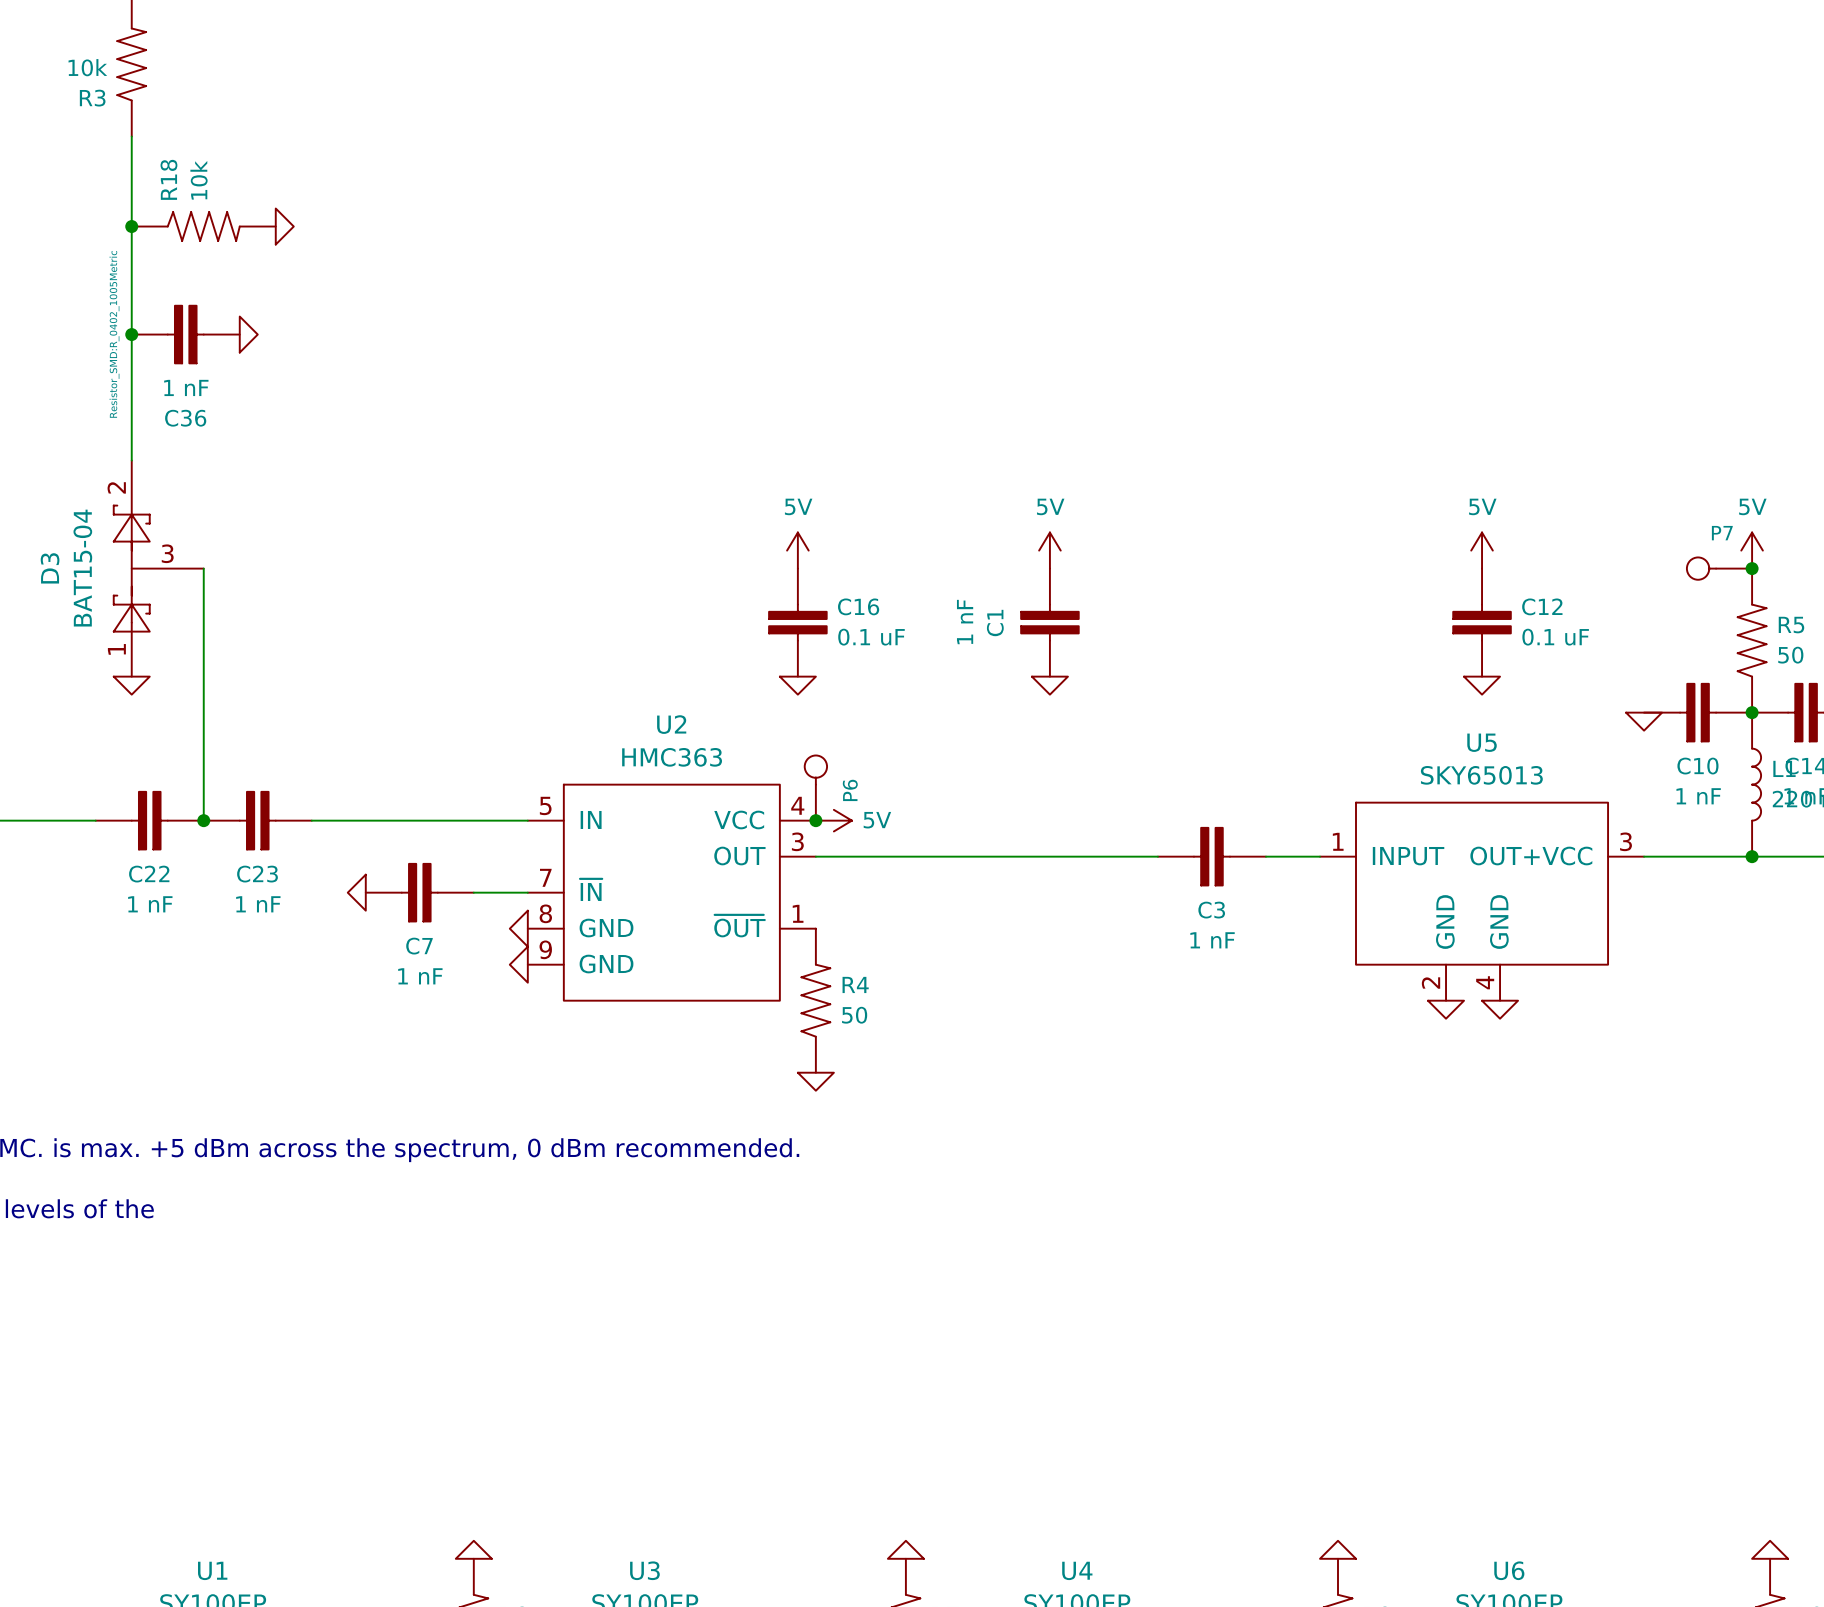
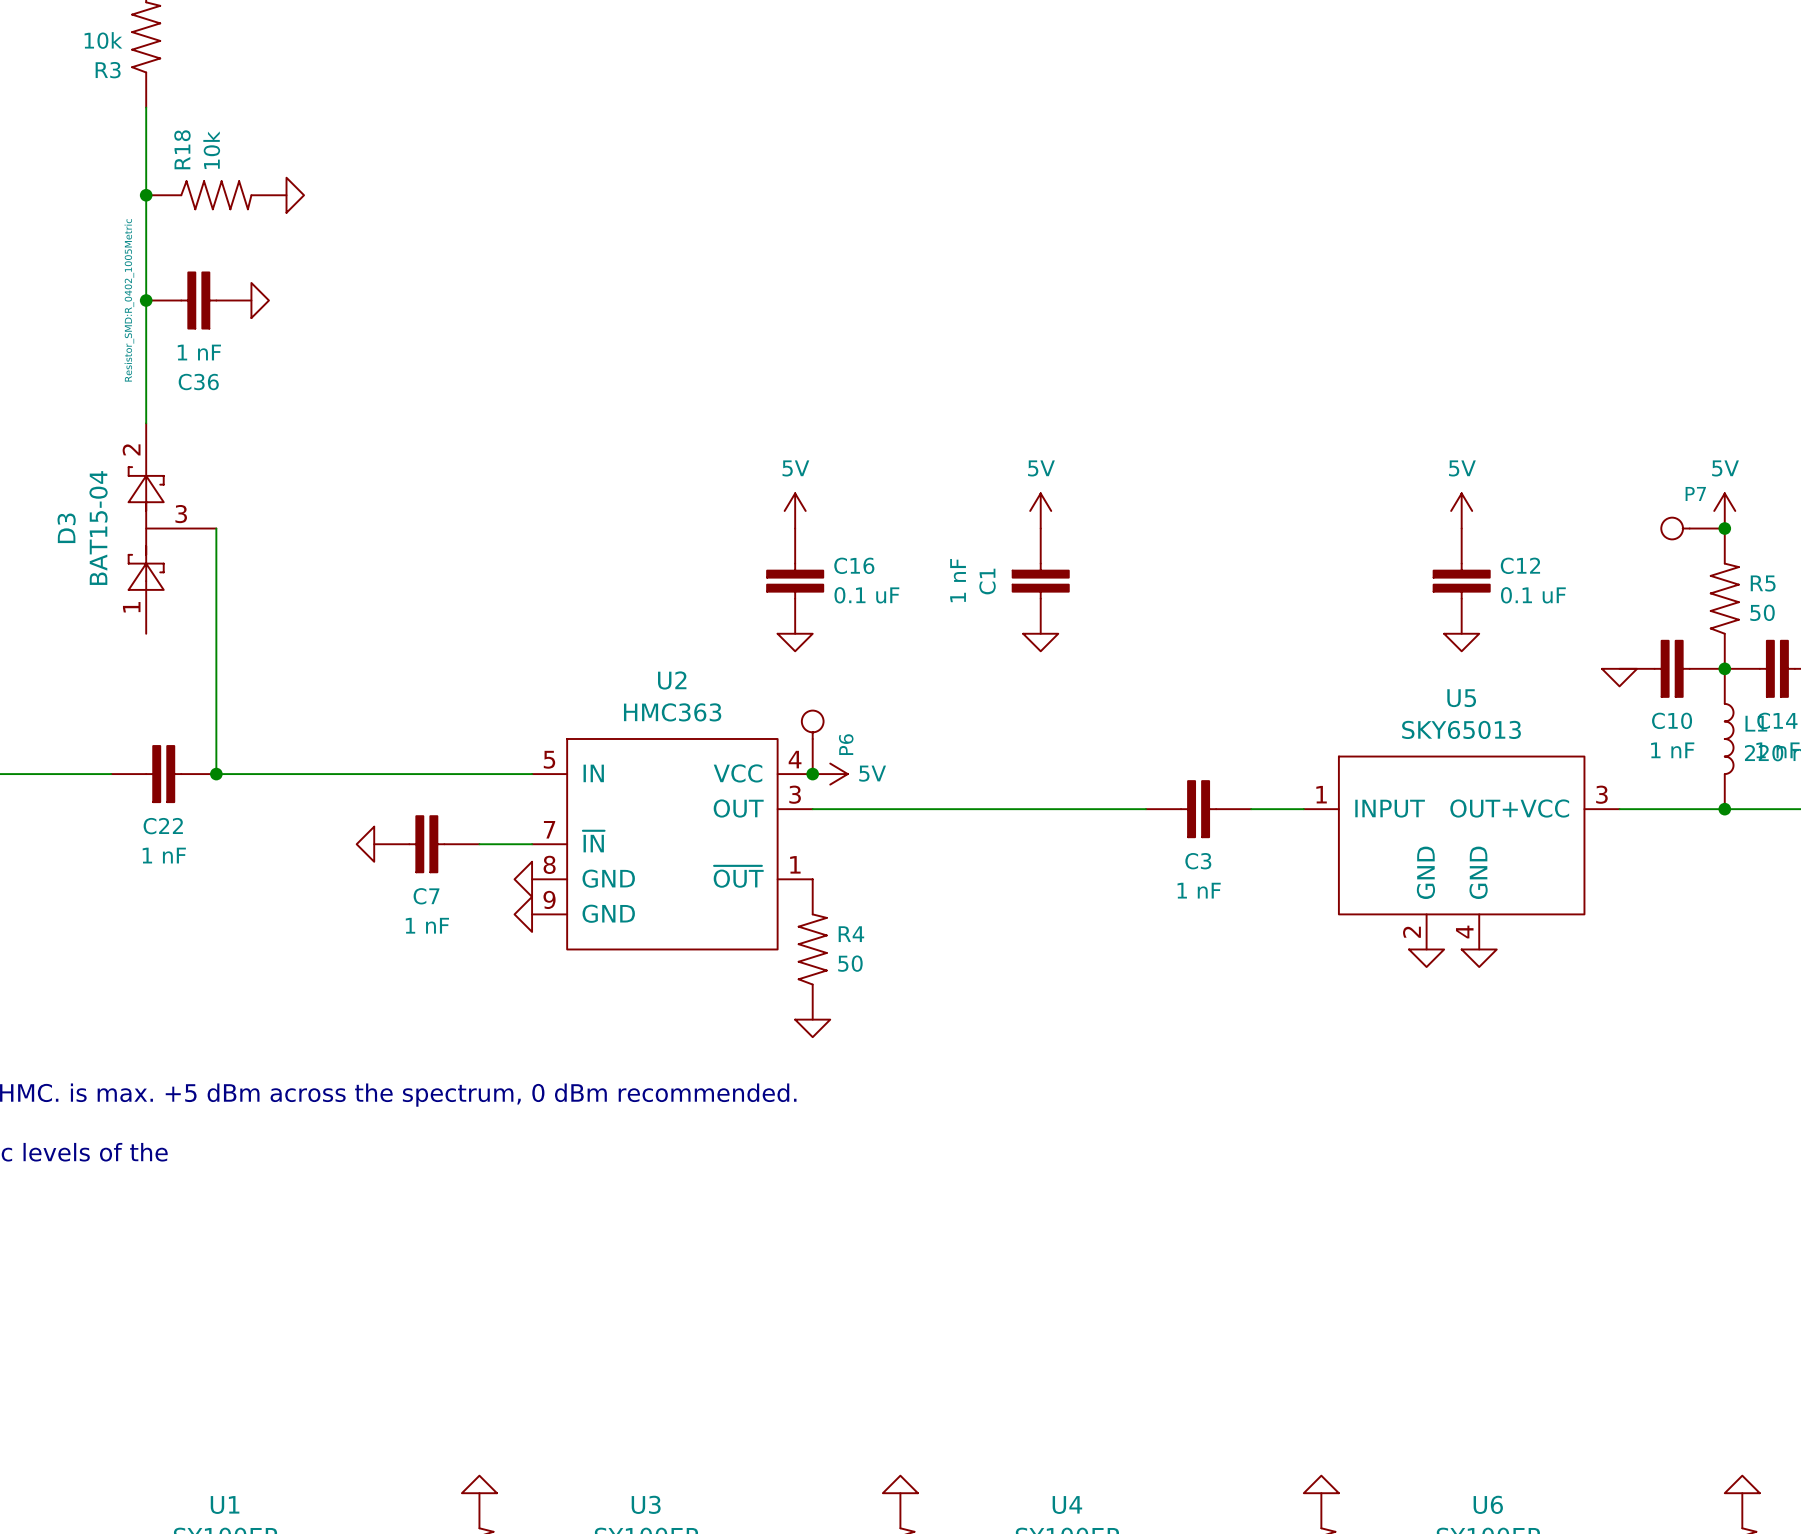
power symbol: (131, 685) -> none
C23: 1 nF (257, 820) -> none

